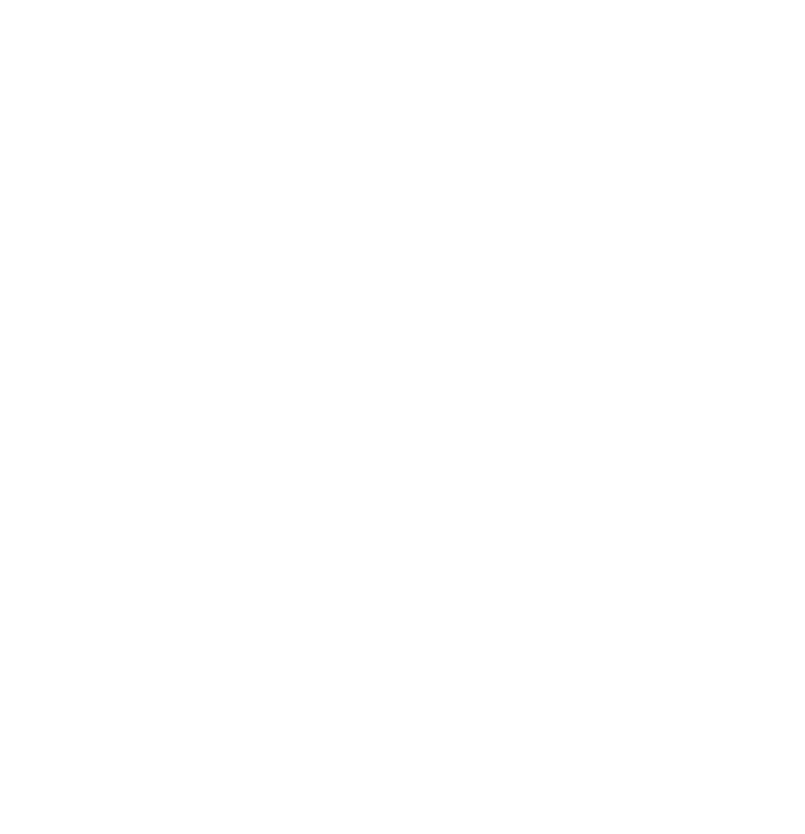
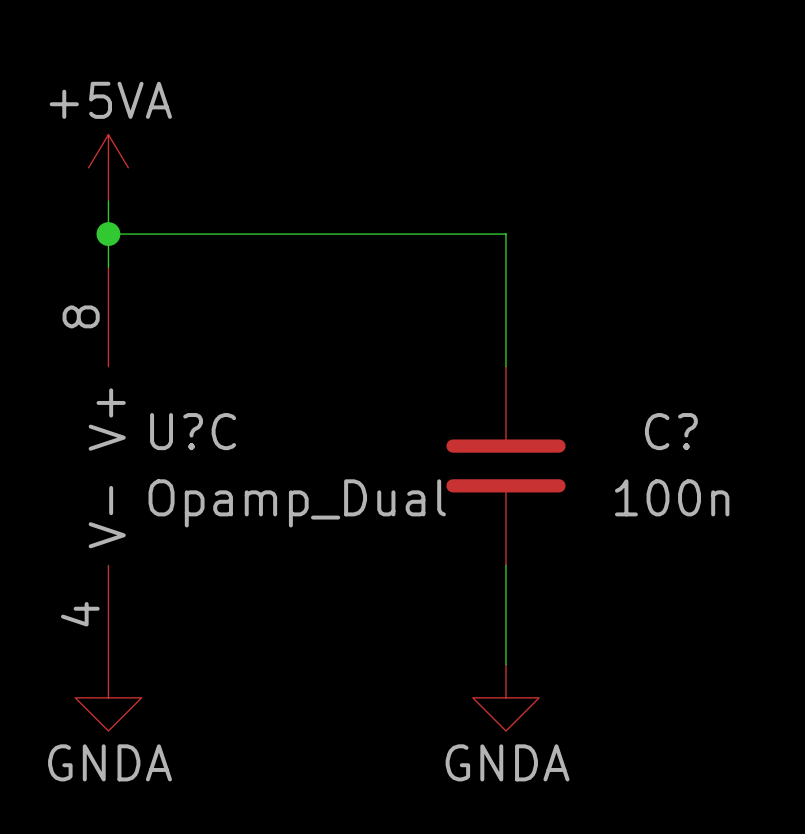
power symbol: none -> +5VA (108, 167)
wire: none -> (108, 200) (108, 267)
wire: none -> (108, 234) (505, 234) (505, 366)
junction: none -> (108, 234)
U?C: none -> Opamp_Dual (108, 465)
C?: none -> 100n (505, 465)
wire: none -> (505, 565) (505, 664)
power symbol: none -> GNDA (108, 697)
power symbol: none -> GNDA (505, 697)

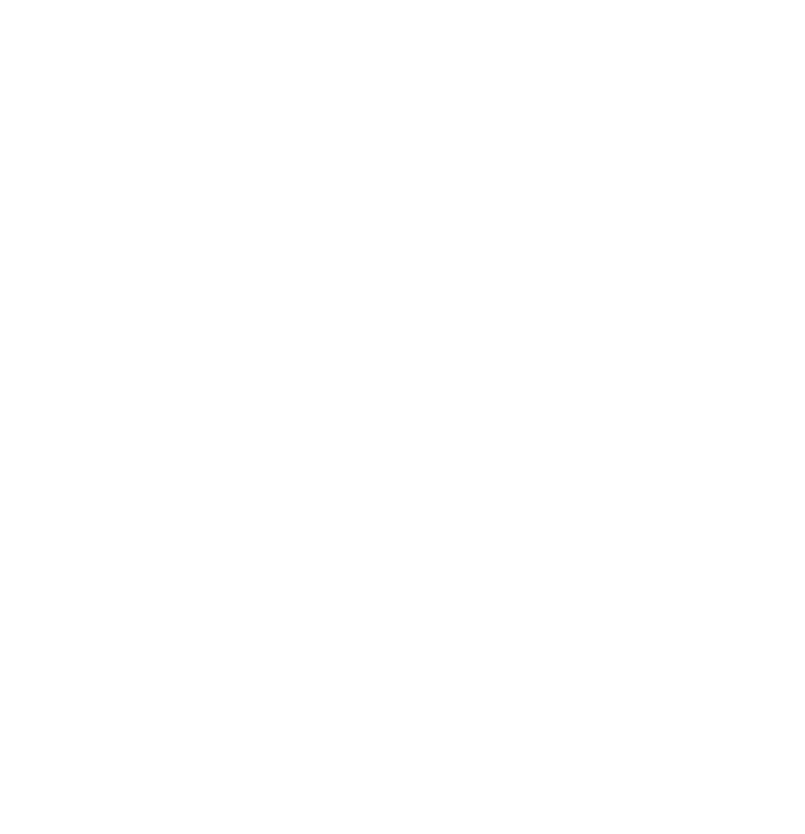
power symbol: +5VA (108, 167) -> none
wire: (108, 200) (108, 267) -> none
wire: (108, 234) (505, 234) (505, 366) -> none
junction: (108, 234) -> none
U?C: Opamp_Dual (108, 465) -> none
C?: 100n (505, 465) -> none
wire: (505, 565) (505, 664) -> none
power symbol: GNDA (108, 697) -> none
power symbol: GNDA (505, 697) -> none

